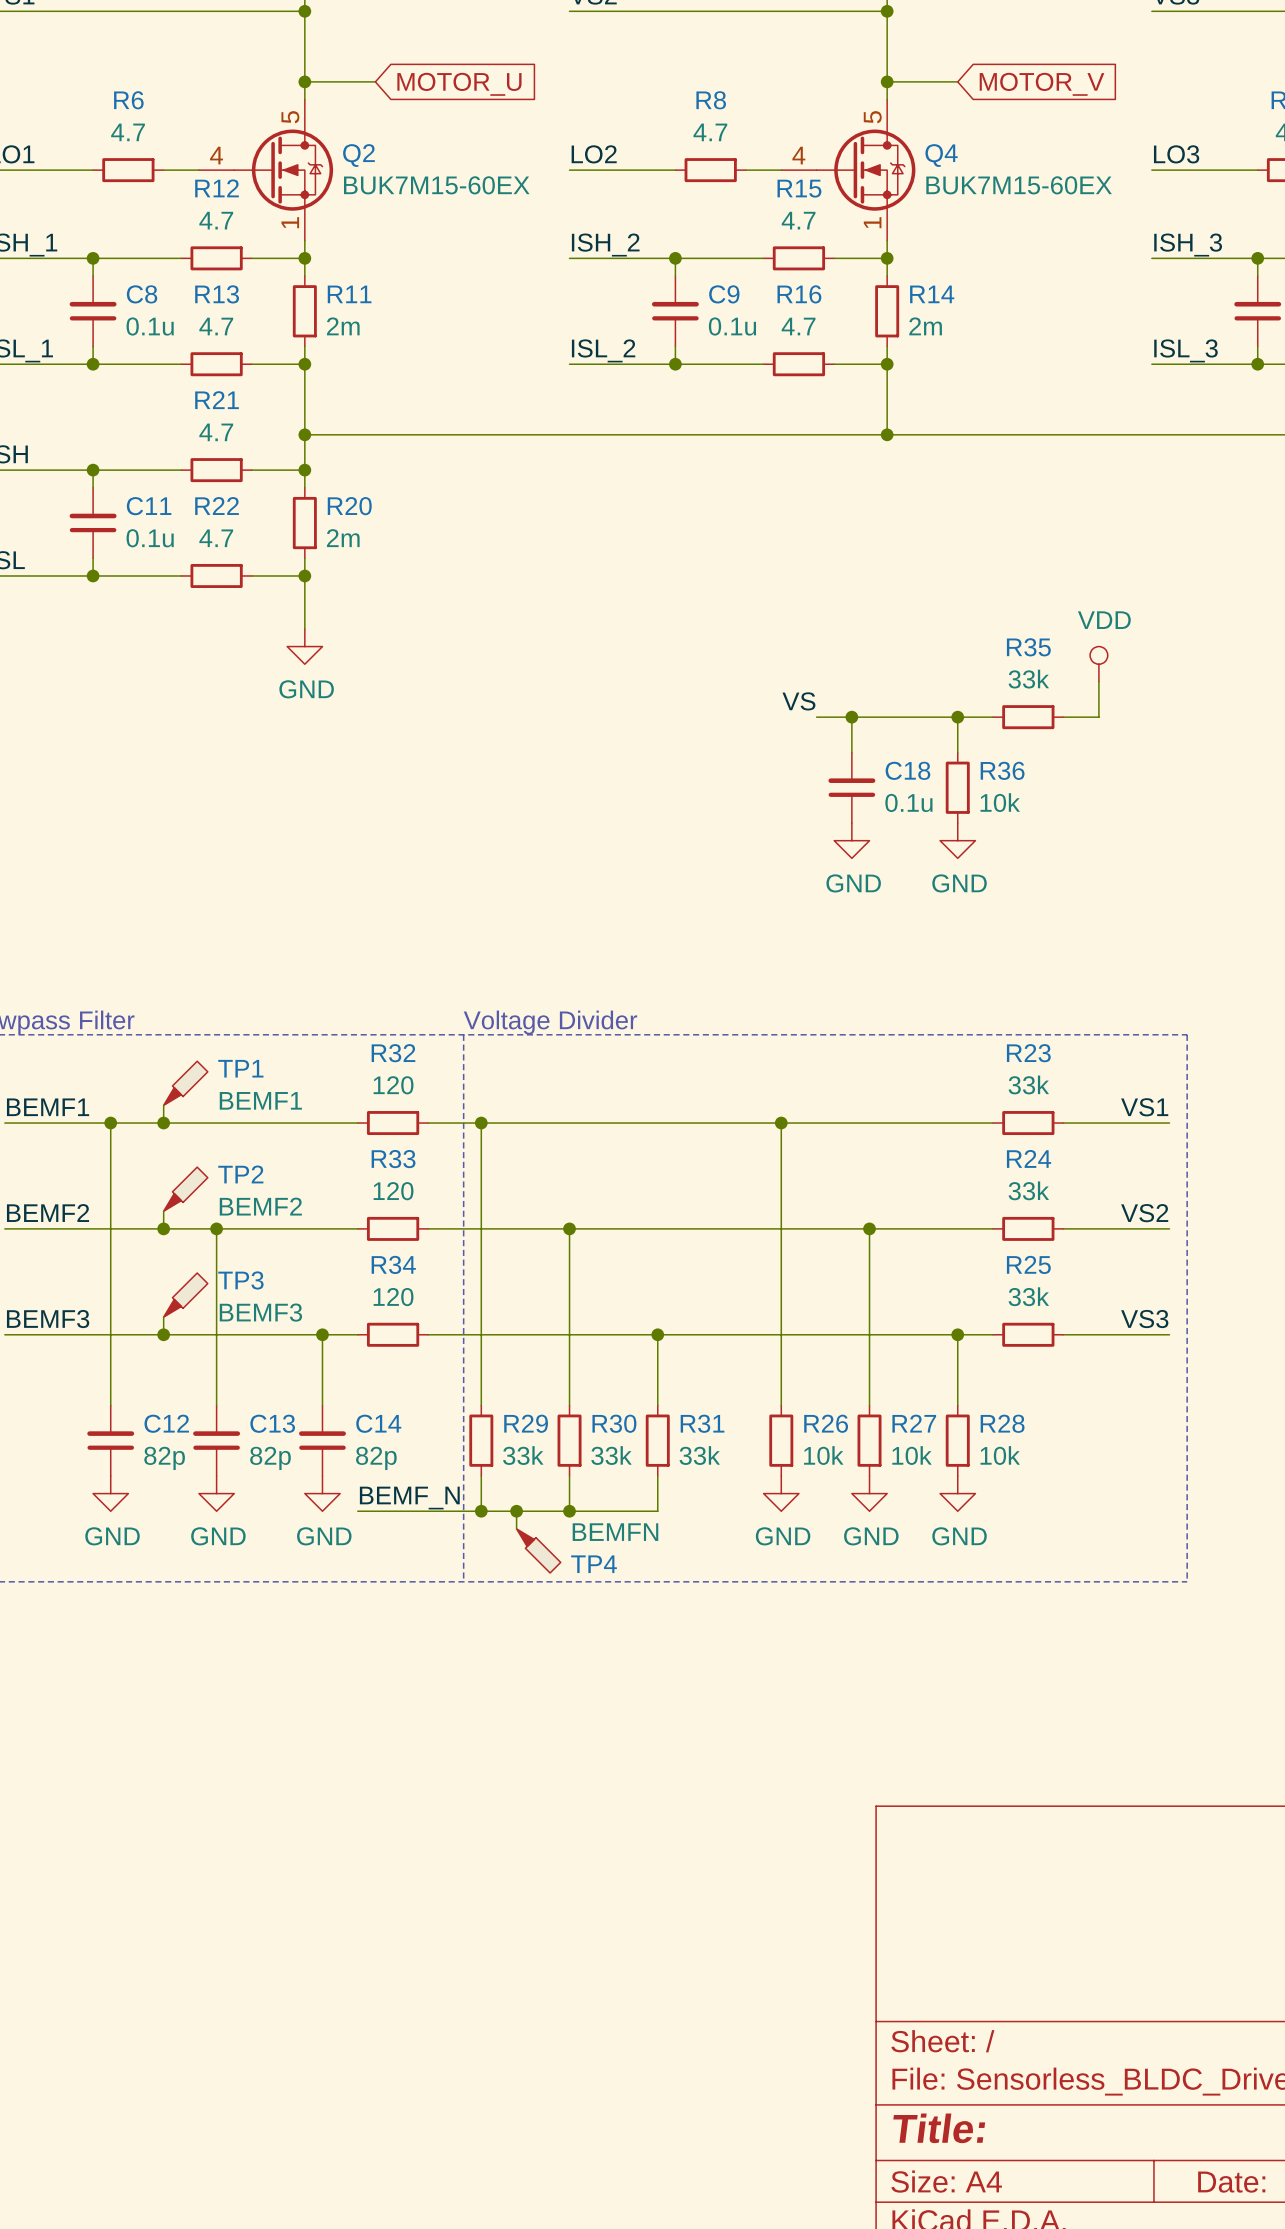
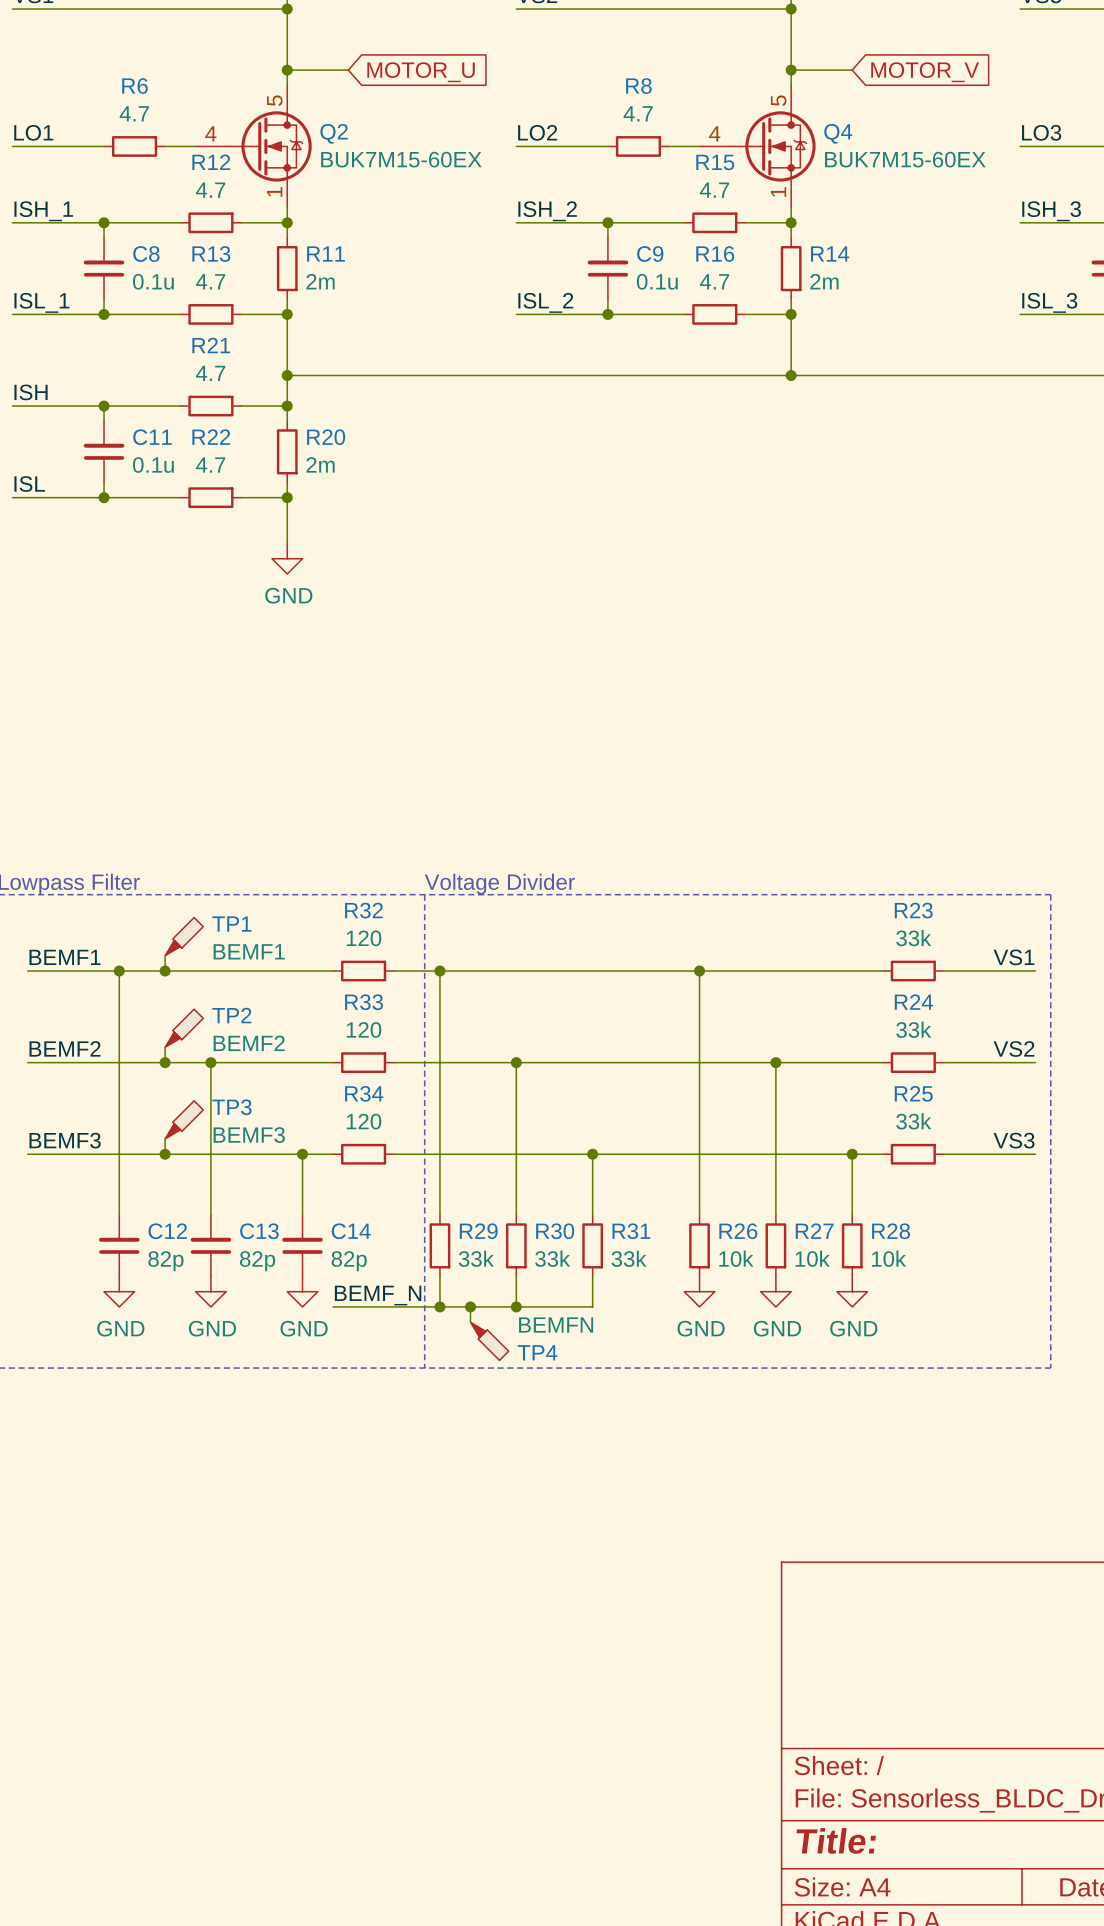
power symbol: VDD (1098, 664) -> none
wire: (1098, 681) (1098, 717) (1063, 717) -> none
label: VS (798, 701) -> none
wire: (816, 717) (993, 717) -> none
wire: (851, 717) (851, 752) -> none
junction: (851, 717) -> none
wire: (957, 717) (957, 752) -> none
junction: (957, 717) -> none
R35: 33k (1028, 717) -> none
C18: 0.1u (851, 787) -> none
R36: 10k (957, 787) -> none
power symbol: GND (851, 840) -> none
power symbol: GND (957, 840) -> none

